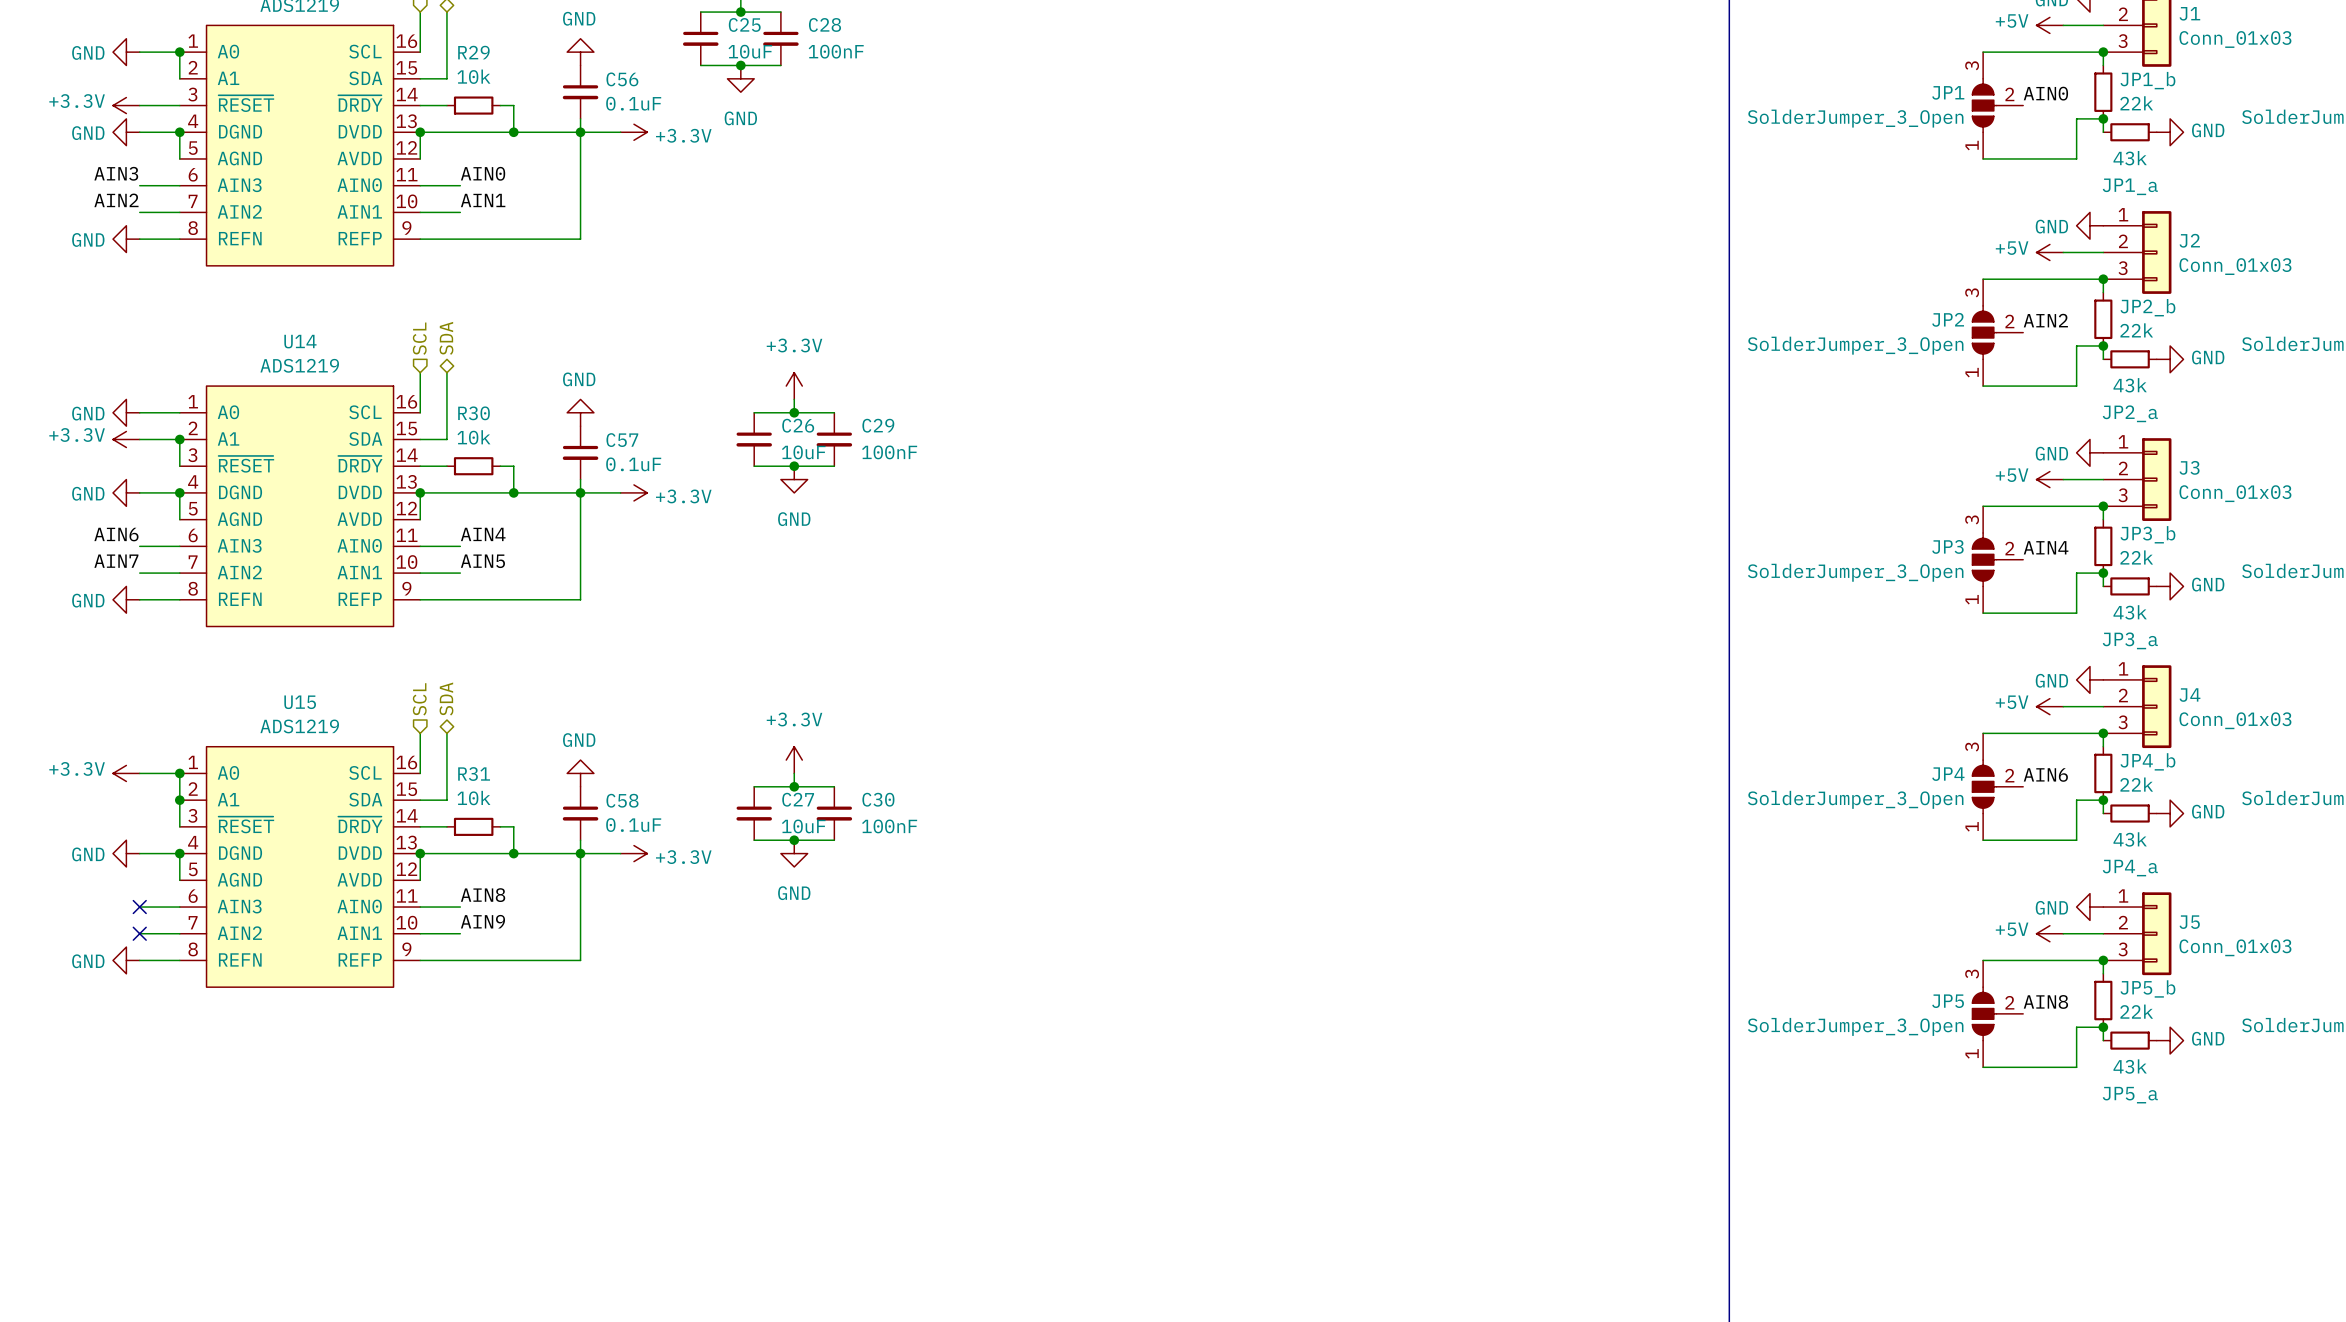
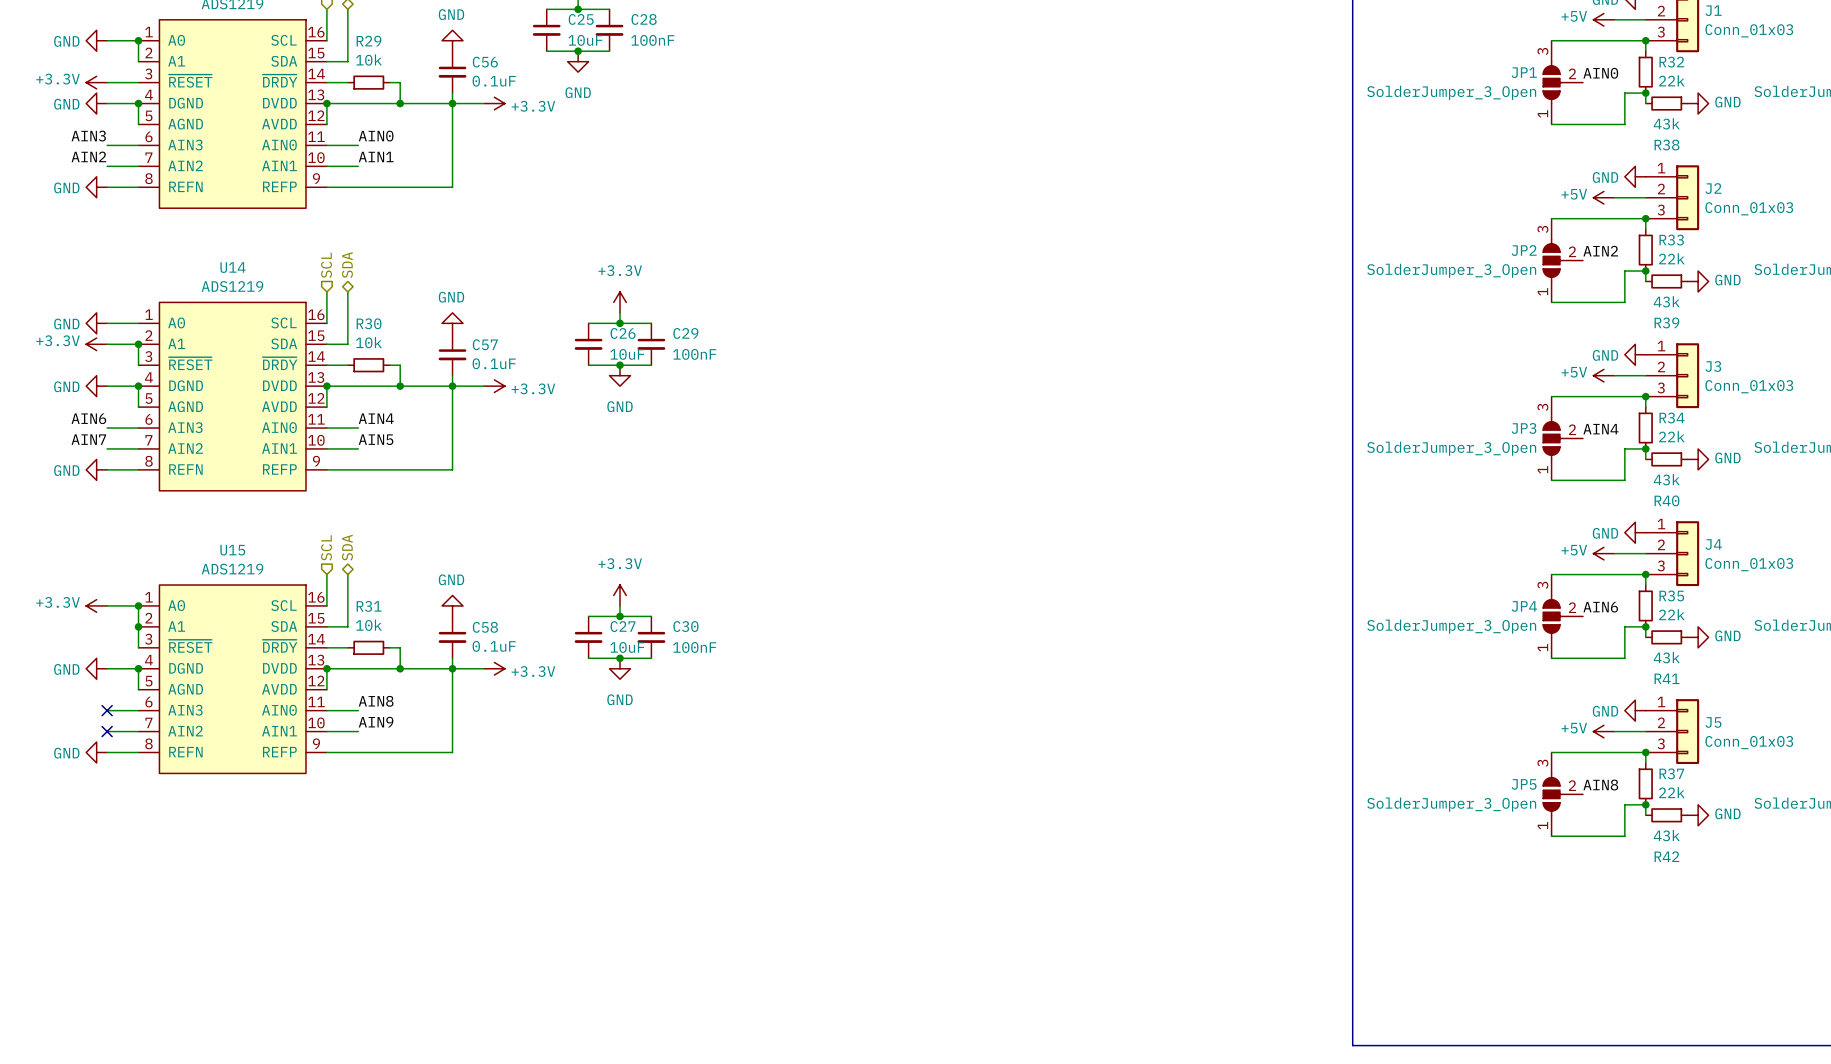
JP1_b name: JP1_b (2147, 80) -> R32 (1671, 62)
JP1_a name: JP1_a (2130, 186) -> R38 (1666, 145)
JP2_b name: JP2_b (2147, 307) -> R33 (1671, 240)
JP2_a name: JP2_a (2130, 413) -> R39 (1666, 322)
JP3_b name: JP3_b (2147, 534) -> R34 (1672, 418)
JP3_a name: JP3_a (2130, 640) -> R40 (1666, 500)
JP4_b name: JP4_b (2147, 761) -> R35 (1671, 595)
JP4_a name: JP4_a (2130, 868) -> R41 (1667, 678)
JP5_b name: JP5_b (2147, 988) -> R37 (1671, 773)
JP5_a name: JP5_a (2130, 1095) -> R42 (1666, 856)

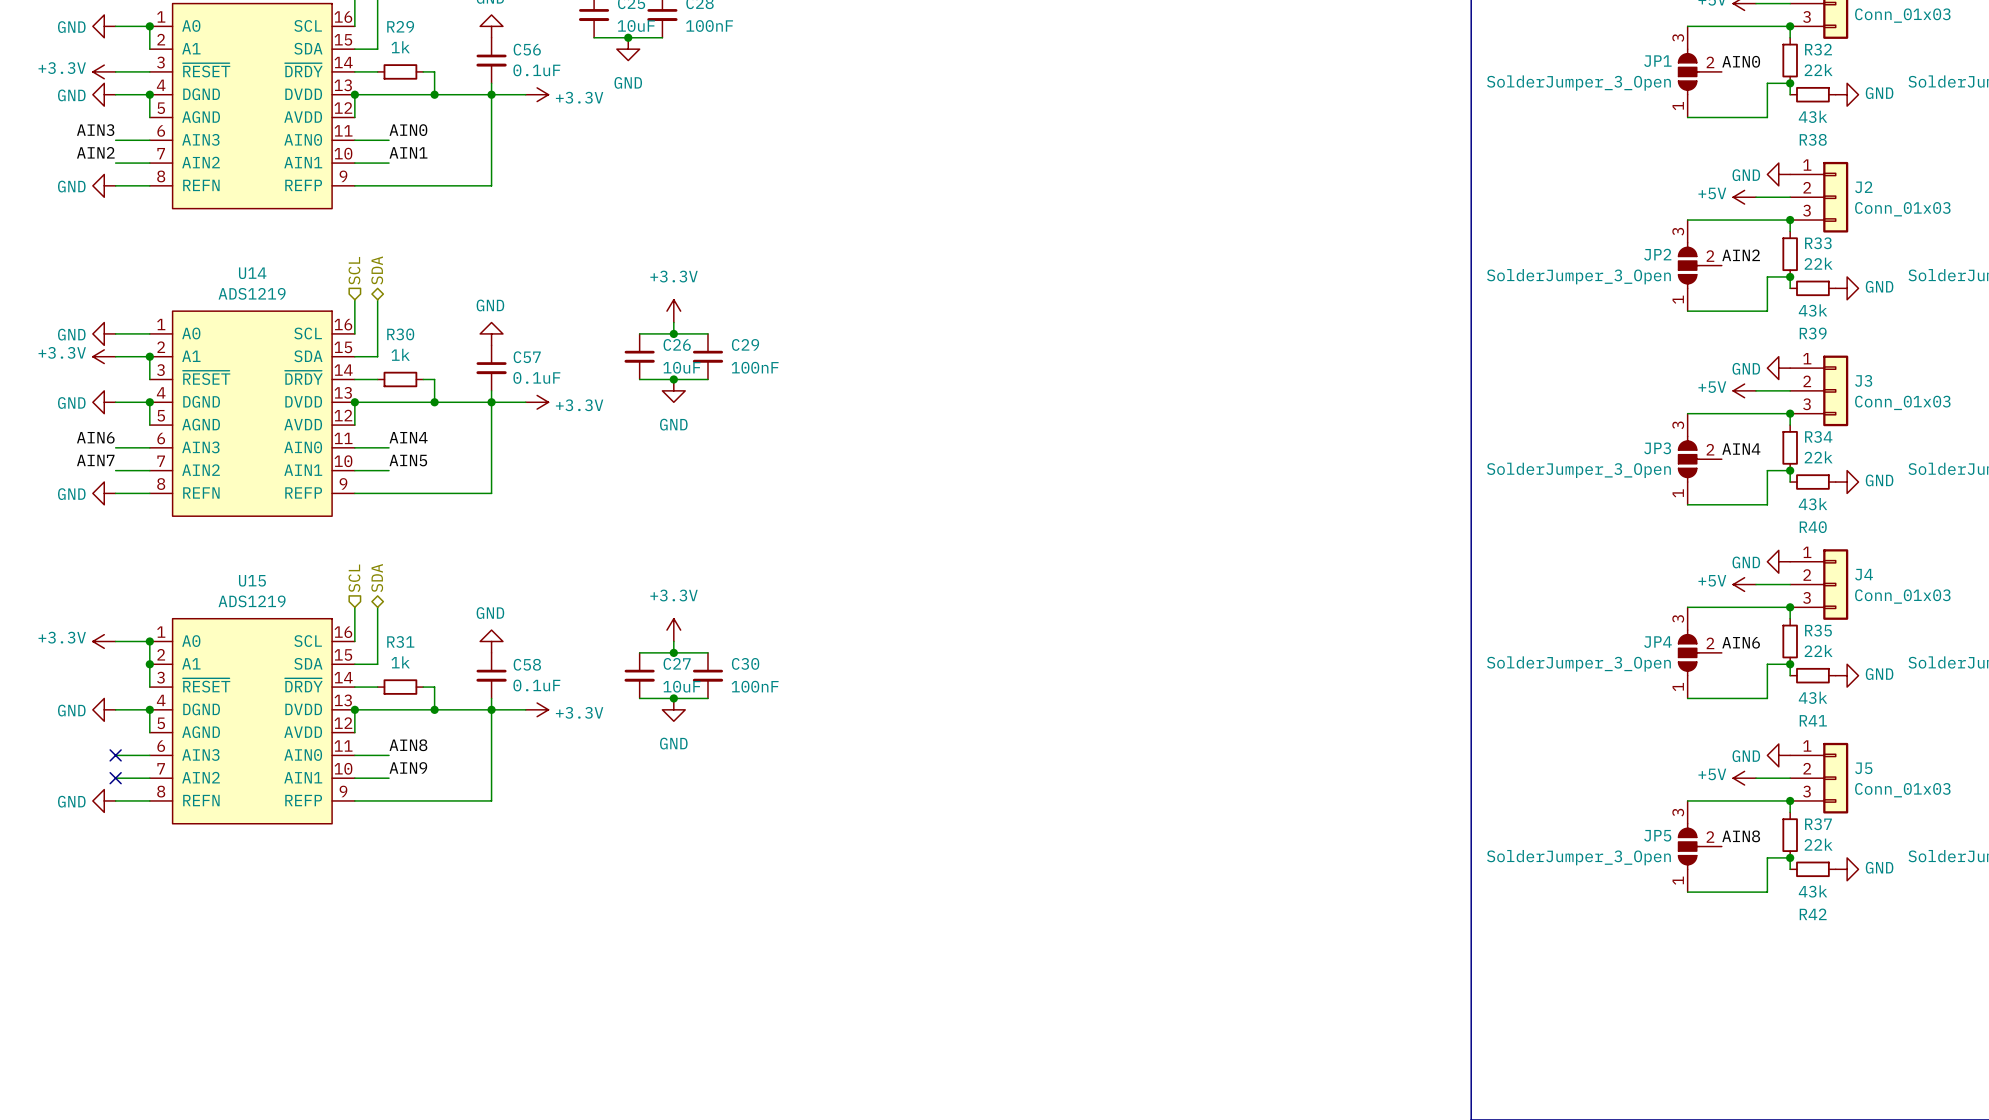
R29 value: 10k (368, 60) -> 1k (400, 47)
R30 value: 10k (368, 342) -> 1k (400, 354)
R31 value: 10k (368, 625) -> 1k (400, 662)

